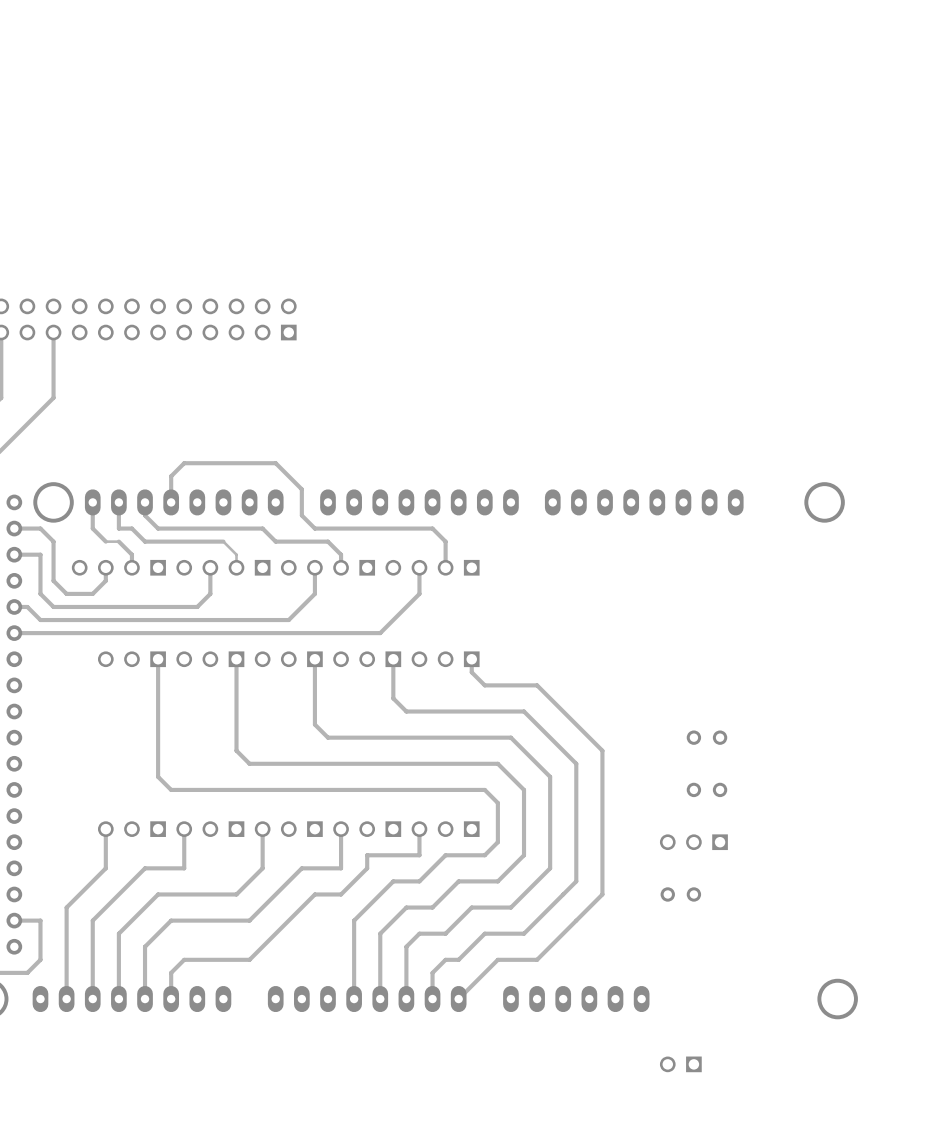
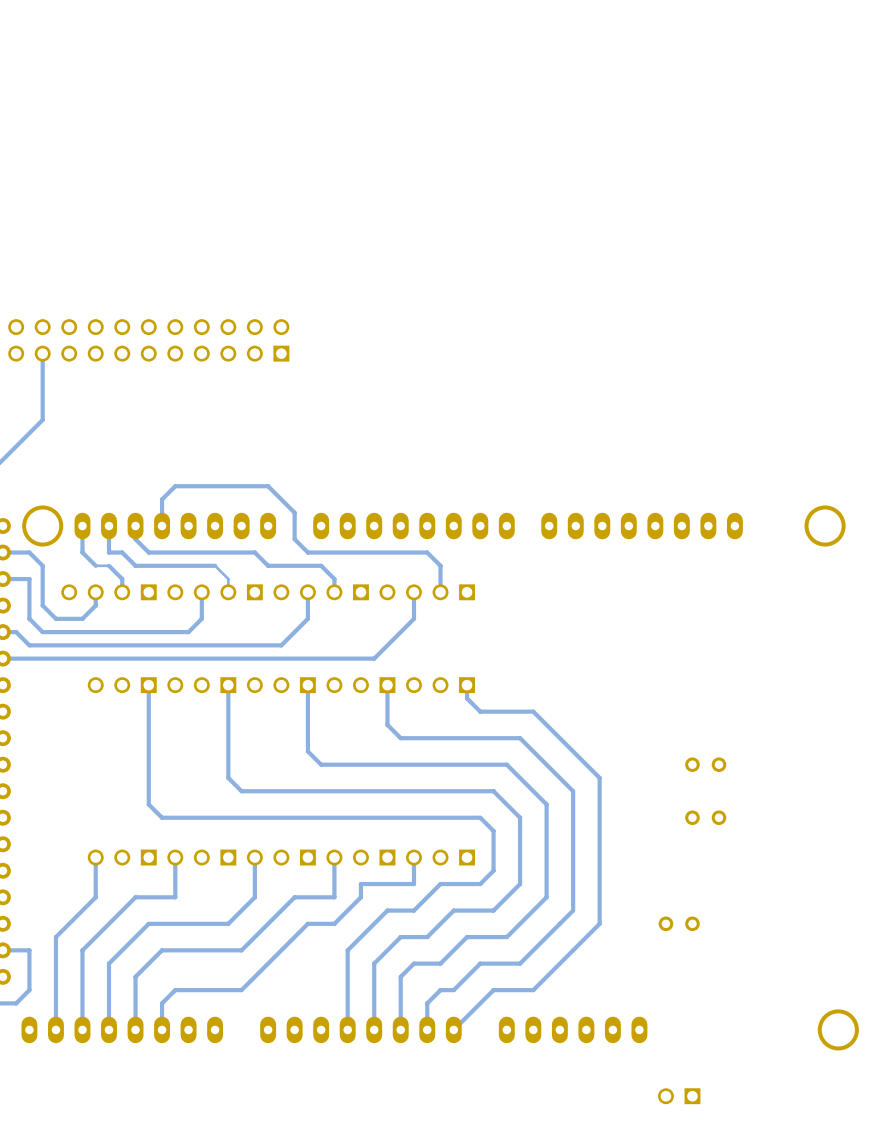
part: (693, 842) -> none

